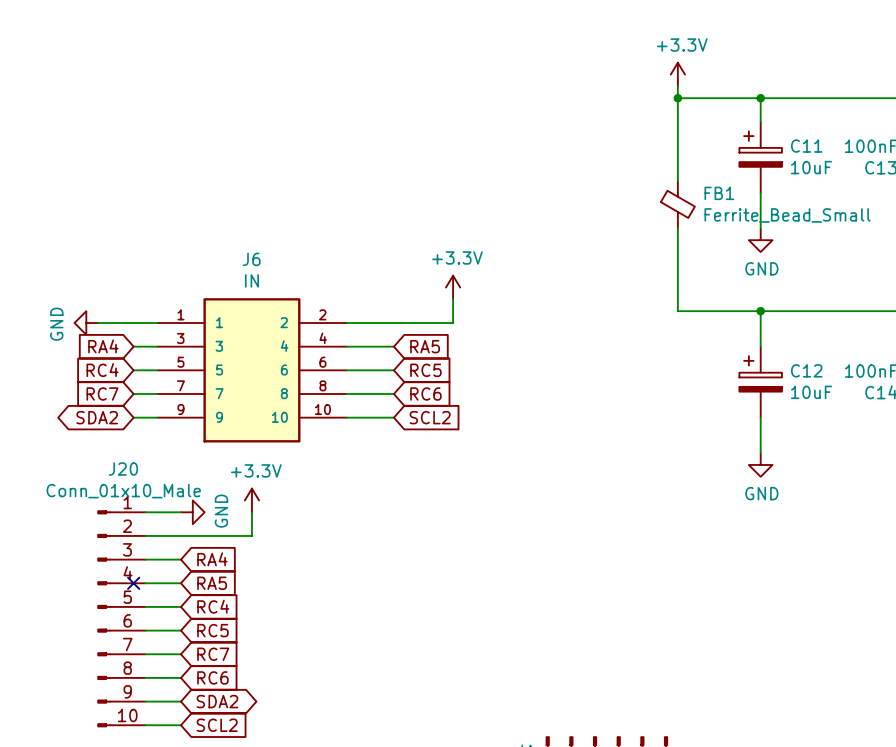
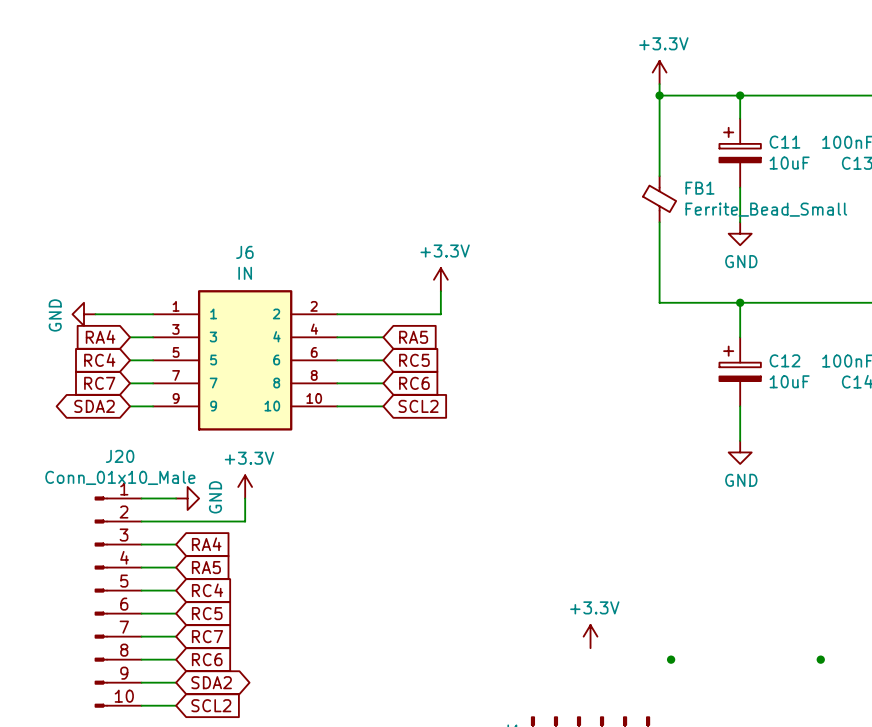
no-connect mark: (133, 583) -> none
power symbol: none -> +3.3V (590, 636)
junction: none -> (671, 659)
junction: none -> (820, 659)

